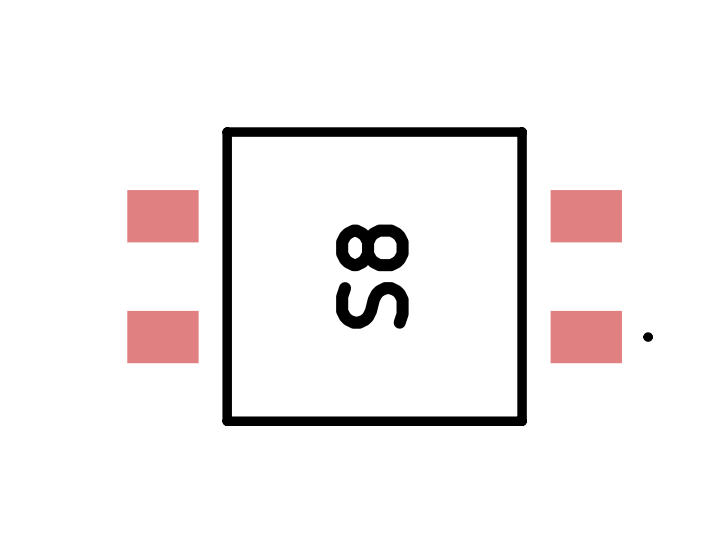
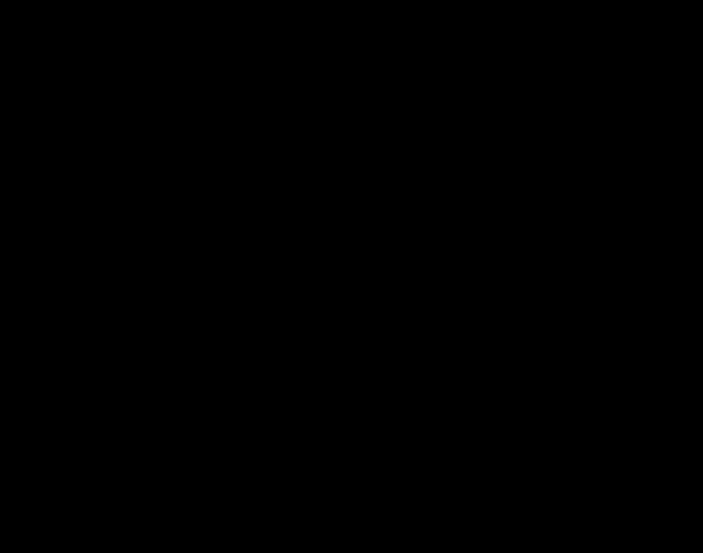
S8: (390, 276) -> none

